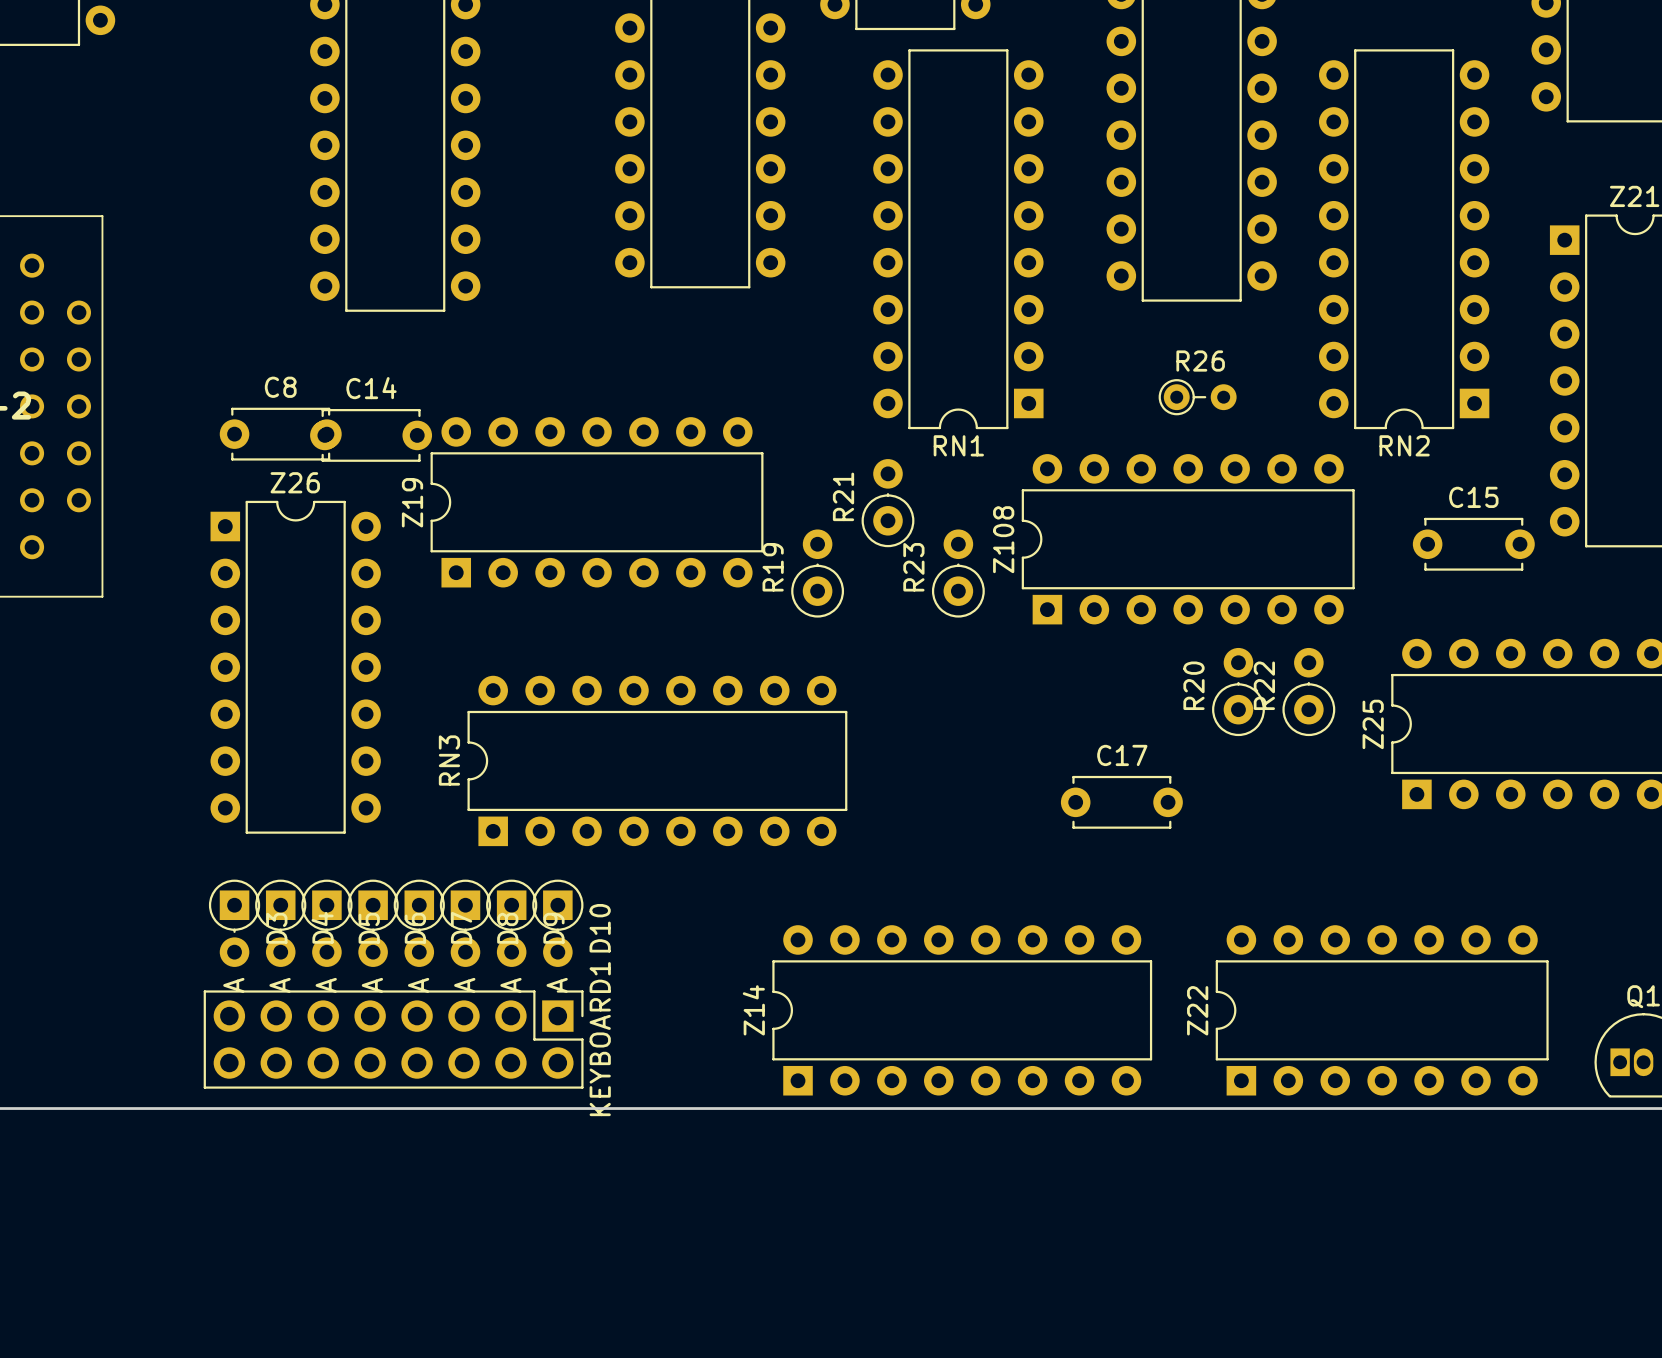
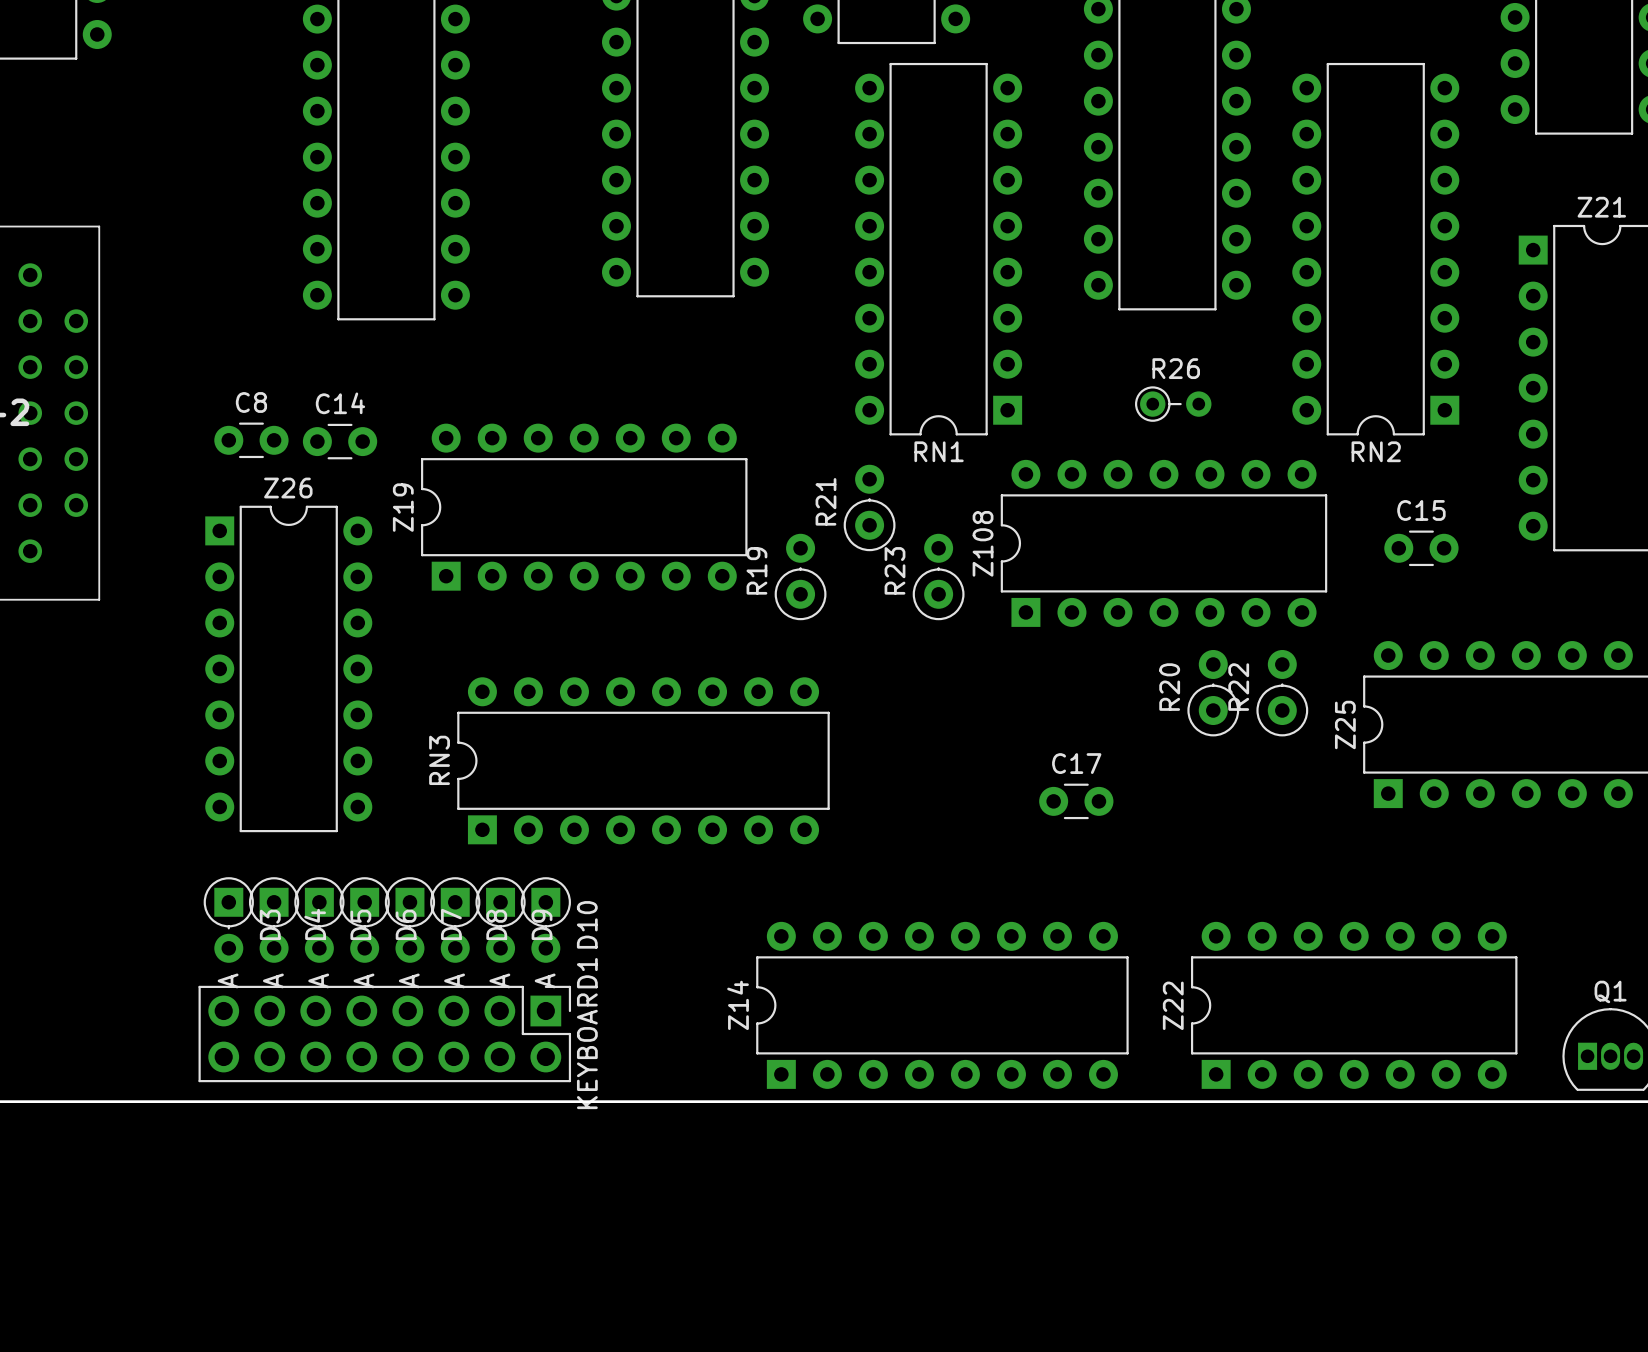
C8 footprint: [219, 407, 342, 461] -> [214, 422, 289, 459]
C14 footprint: [310, 409, 433, 462] -> [302, 423, 378, 460]
C15 footprint: [1412, 517, 1535, 571] -> [1384, 530, 1459, 567]
C17 footprint: [1060, 775, 1183, 829] -> [1039, 783, 1114, 820]

